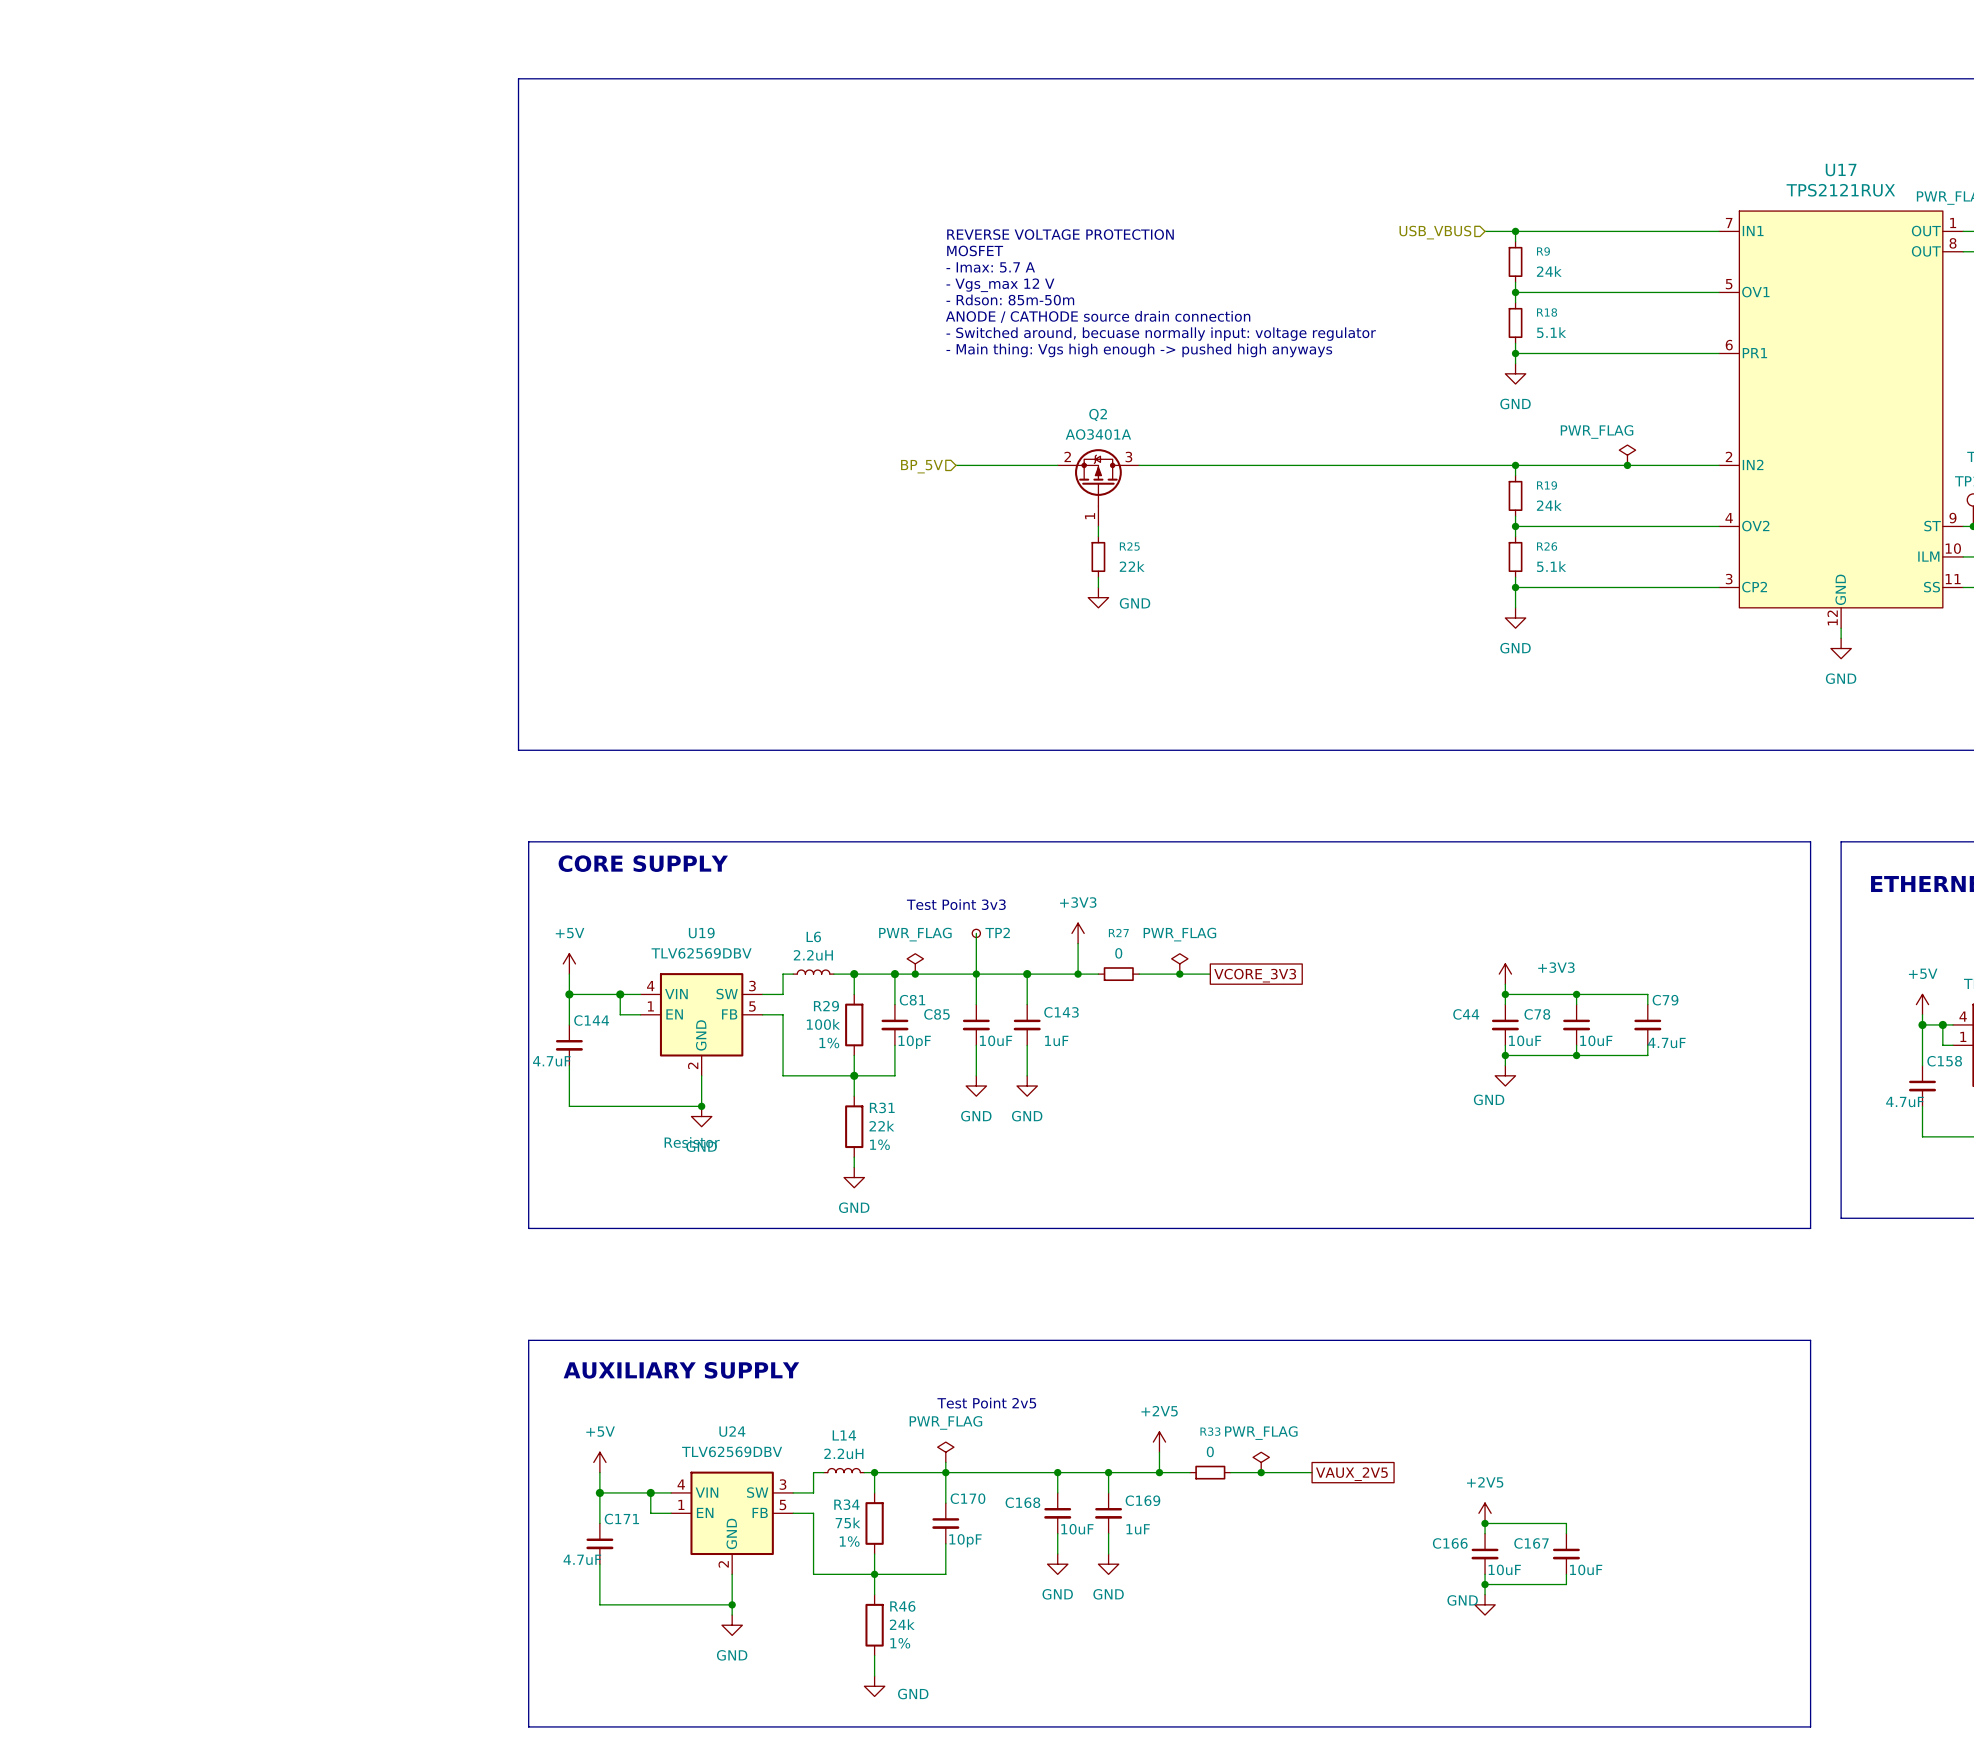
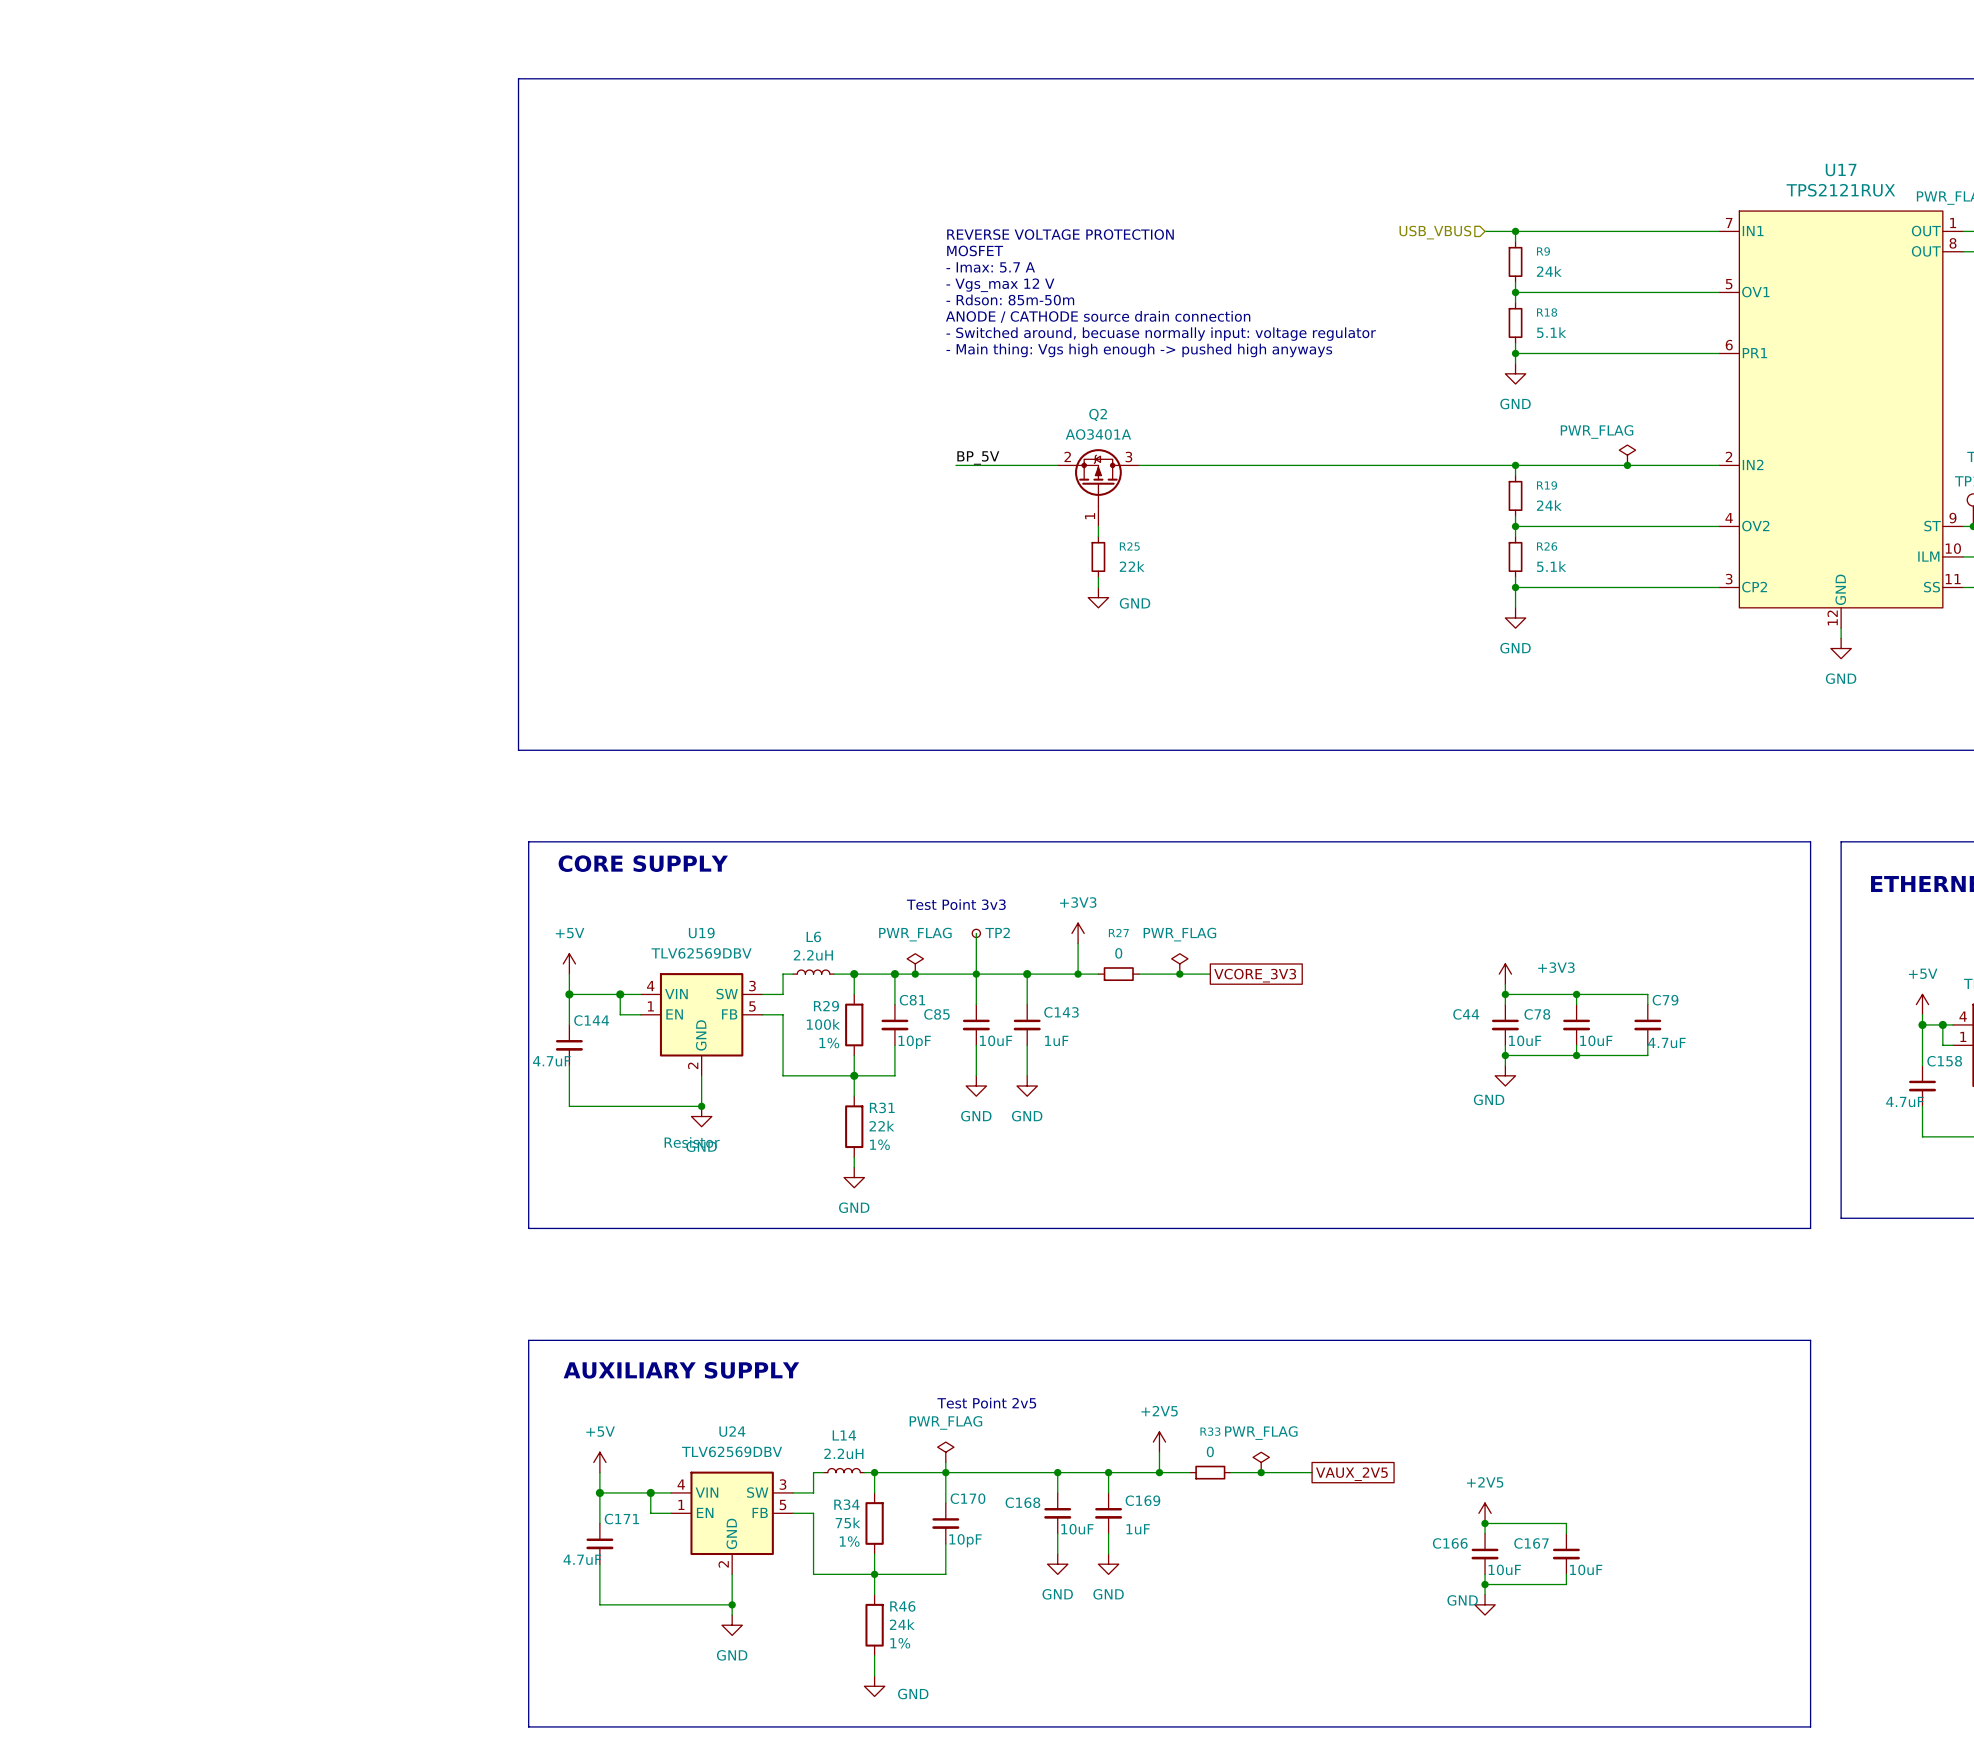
label: none -> BP_5V (978, 457)
hierarchical label: BP_5V (921, 466) -> none

